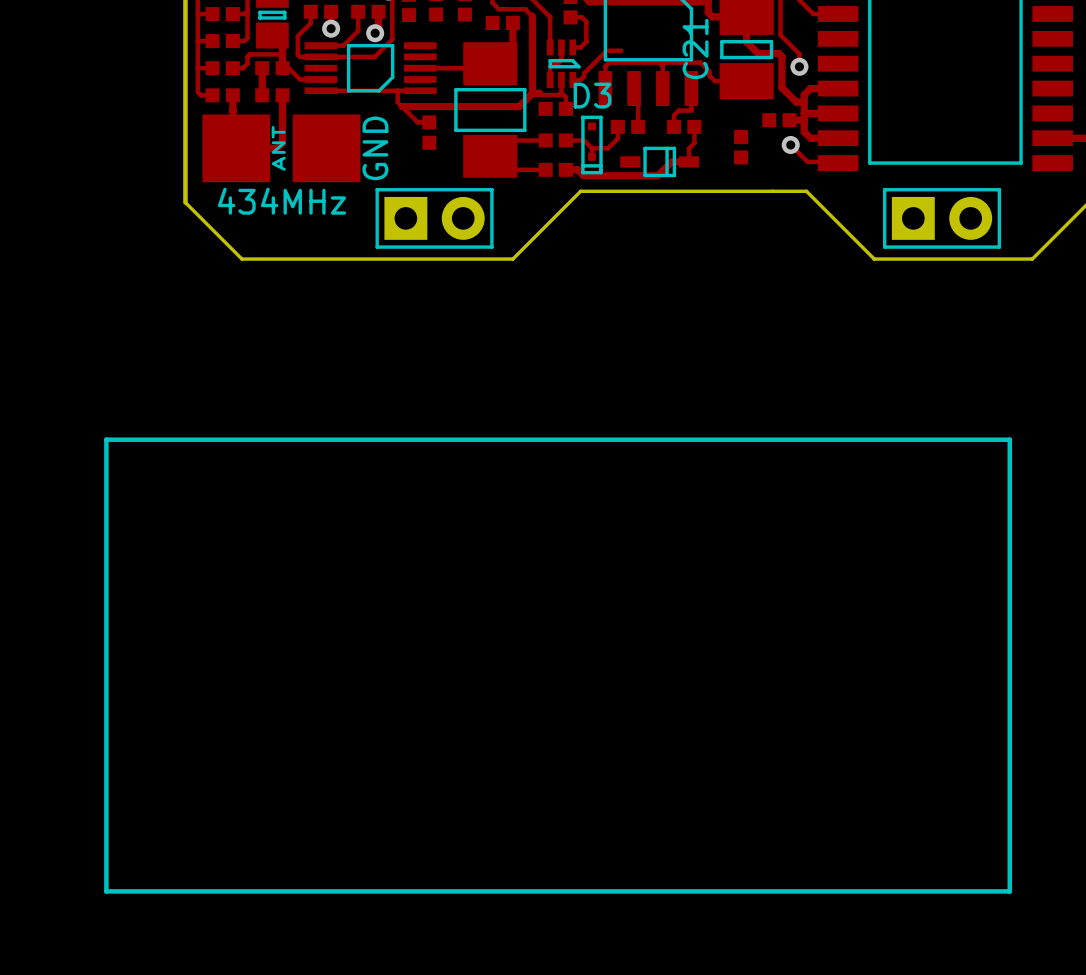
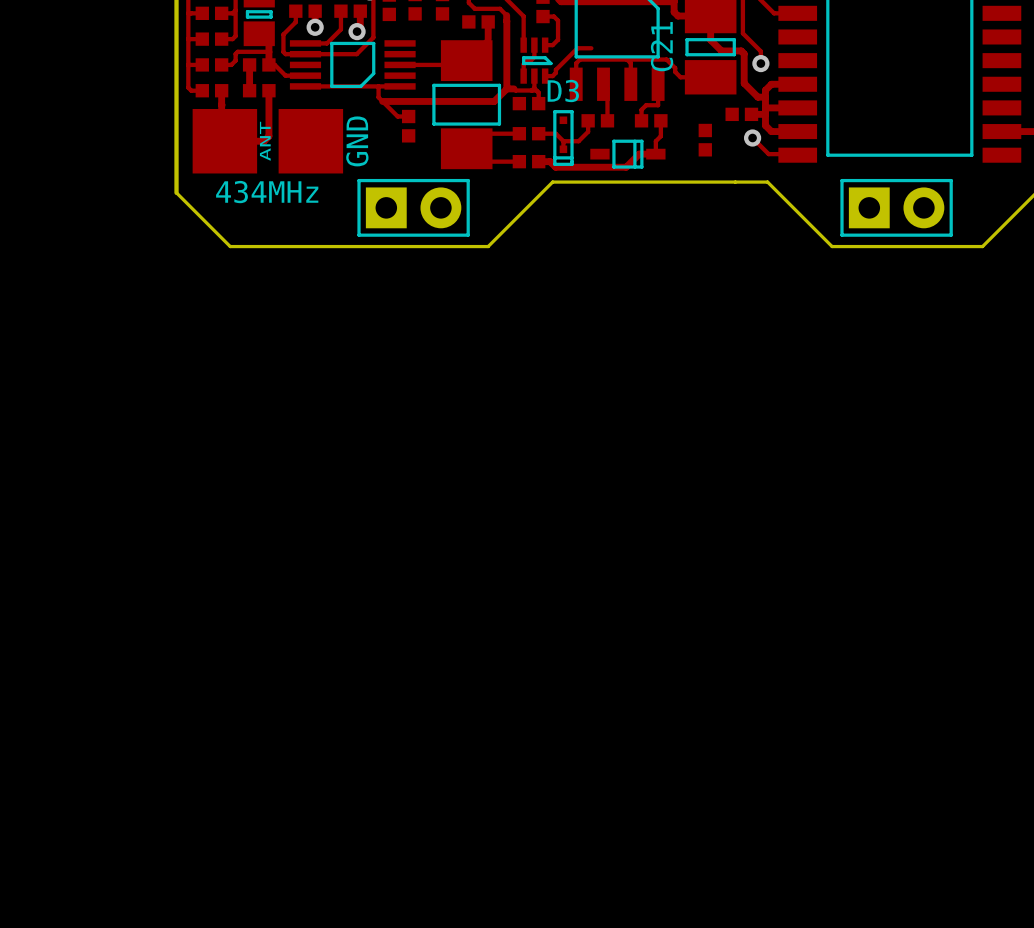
line: (106, 439) (1009, 439) (1009, 891) (106, 891) (106, 439) -> none

